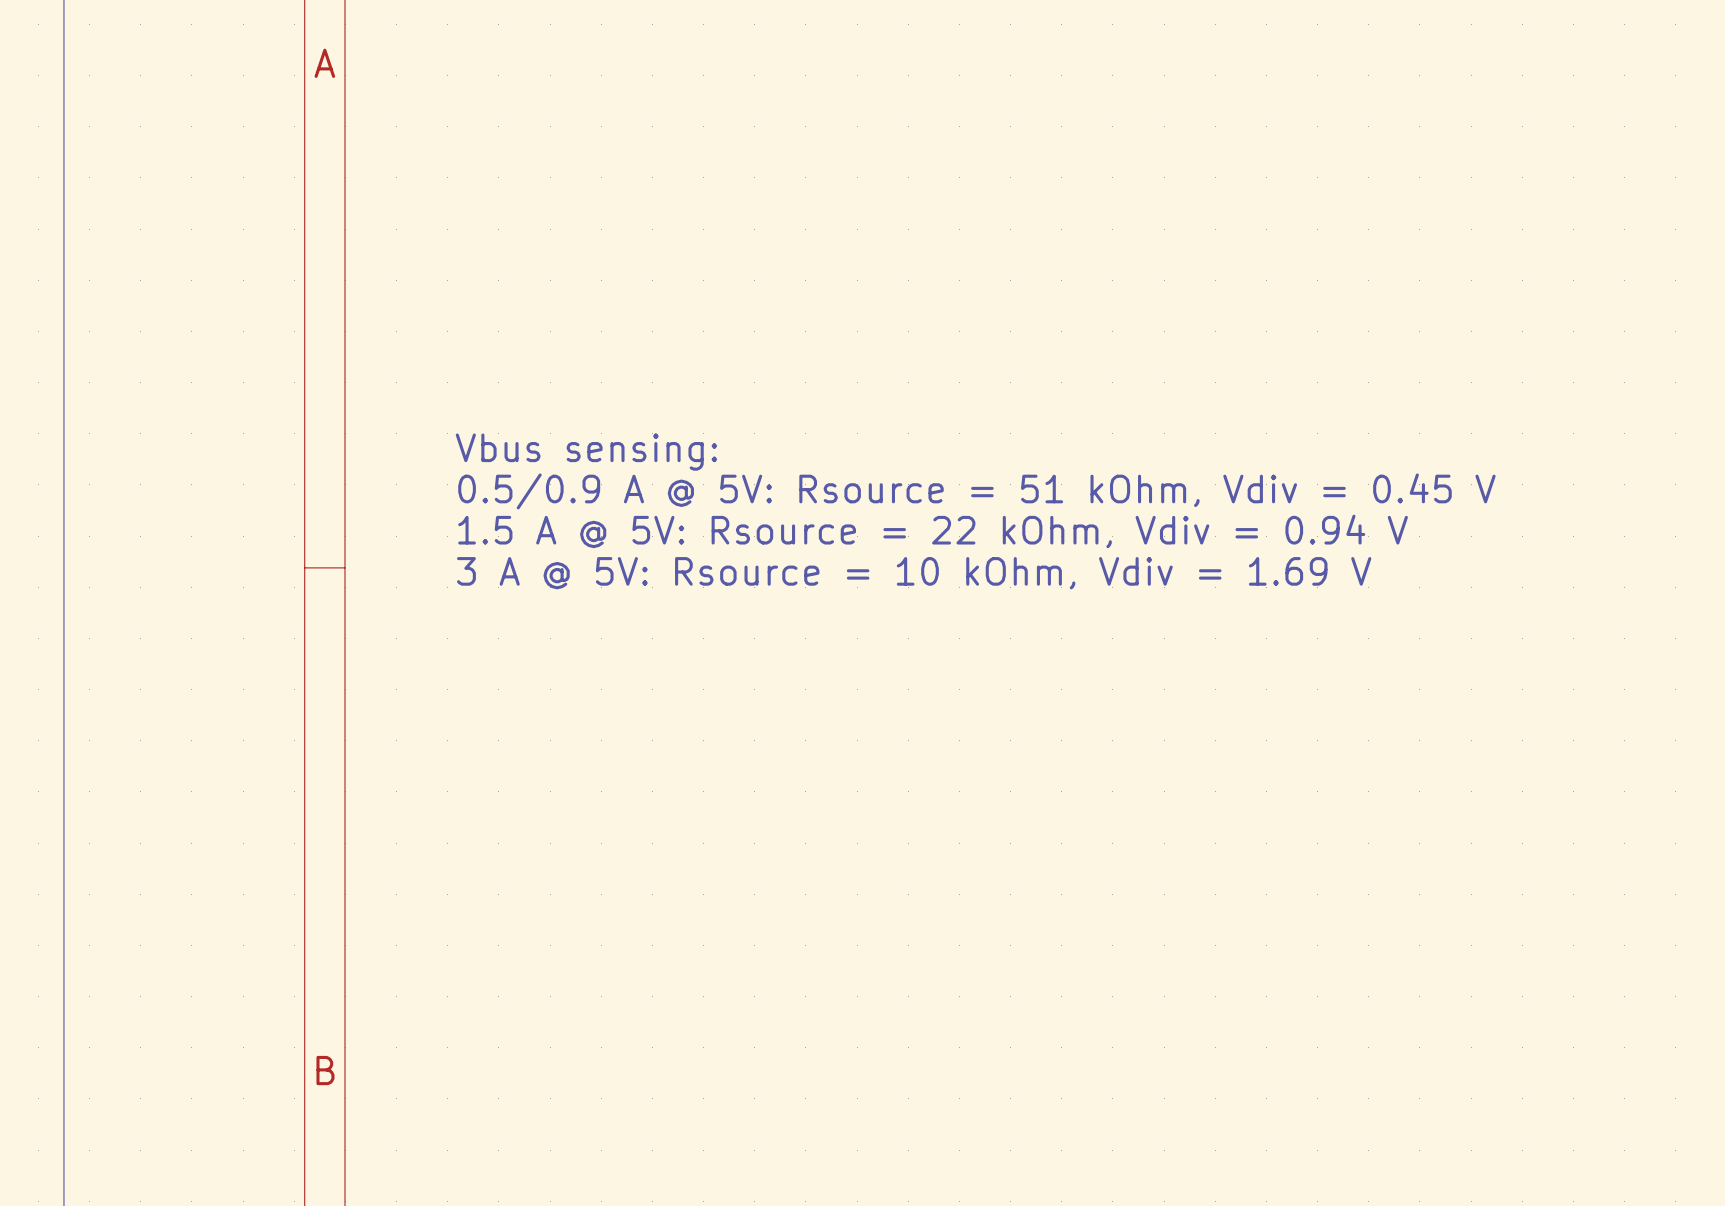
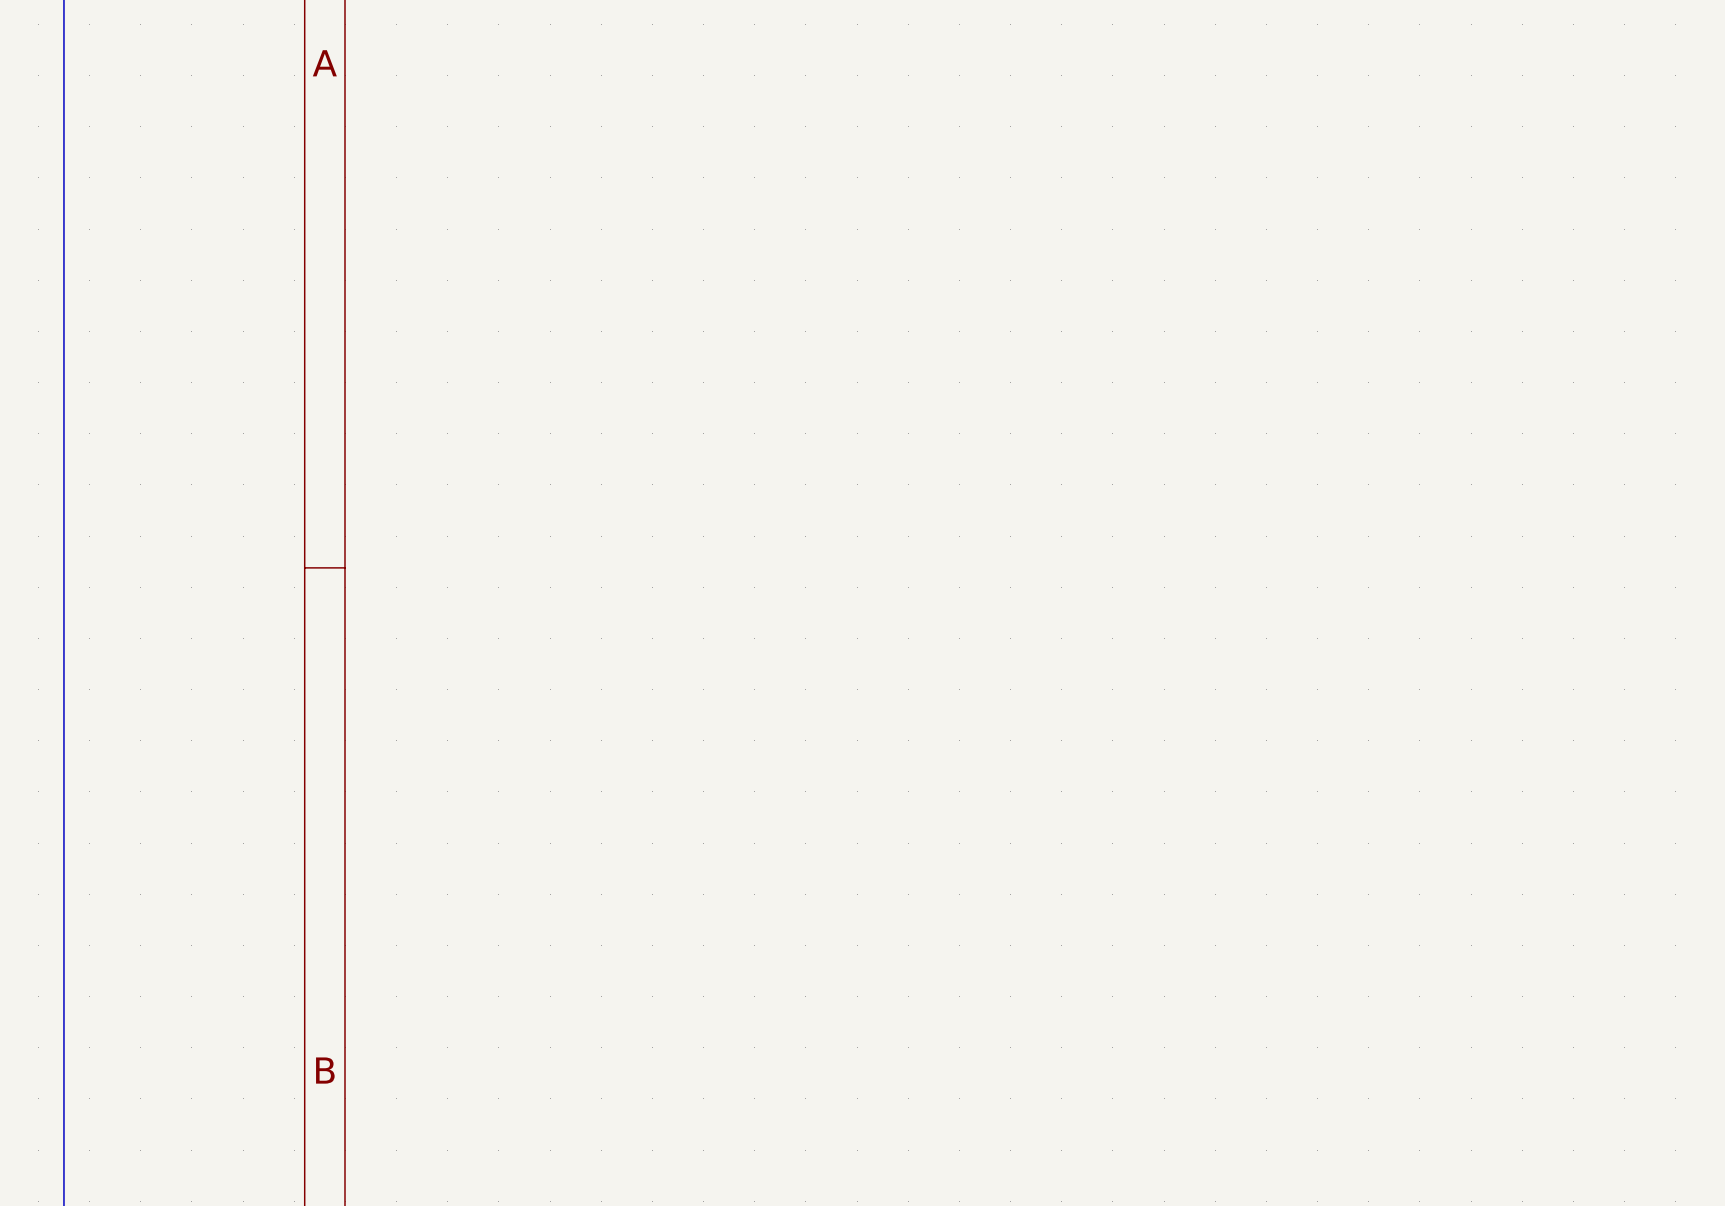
text: Vbus sensing: (586, 452) -> none
text: 0.5/0.9 A @ 5V: Rsource = 51 kOhm, Vdiv = 0.45 V (976, 491) -> none
text: 1.5 A @ 5V: Rsource = 22 kOhm, Vdiv = 0.94 V (933, 531) -> none
text: 3 A @ 5V: Rsource = 10 kOhm, Vdiv = 1.69 V (914, 573) -> none

